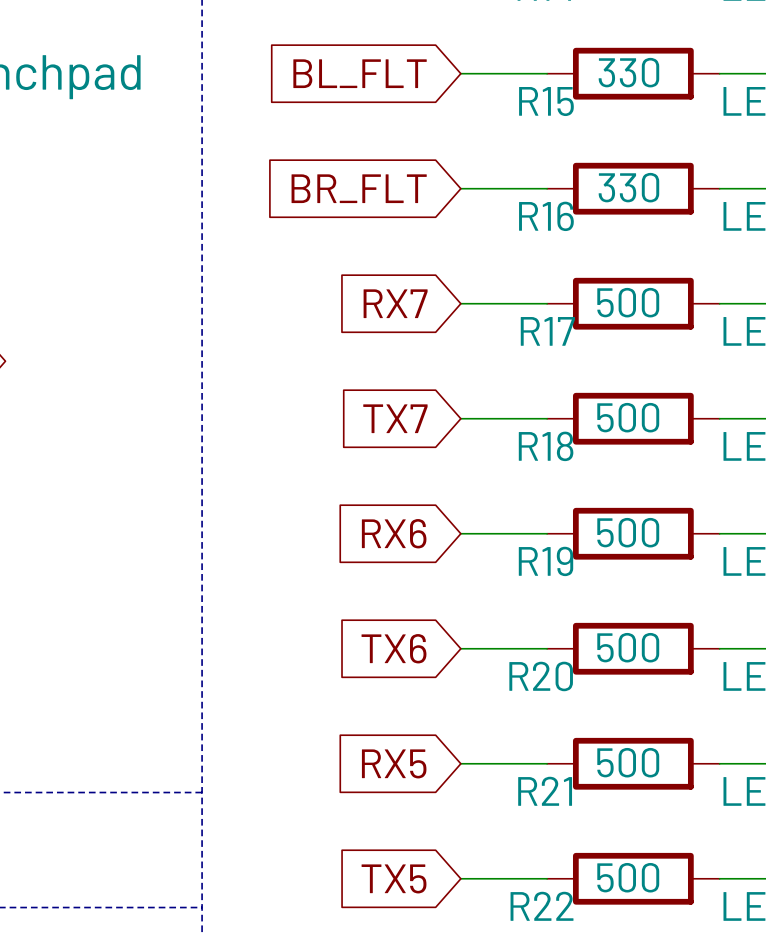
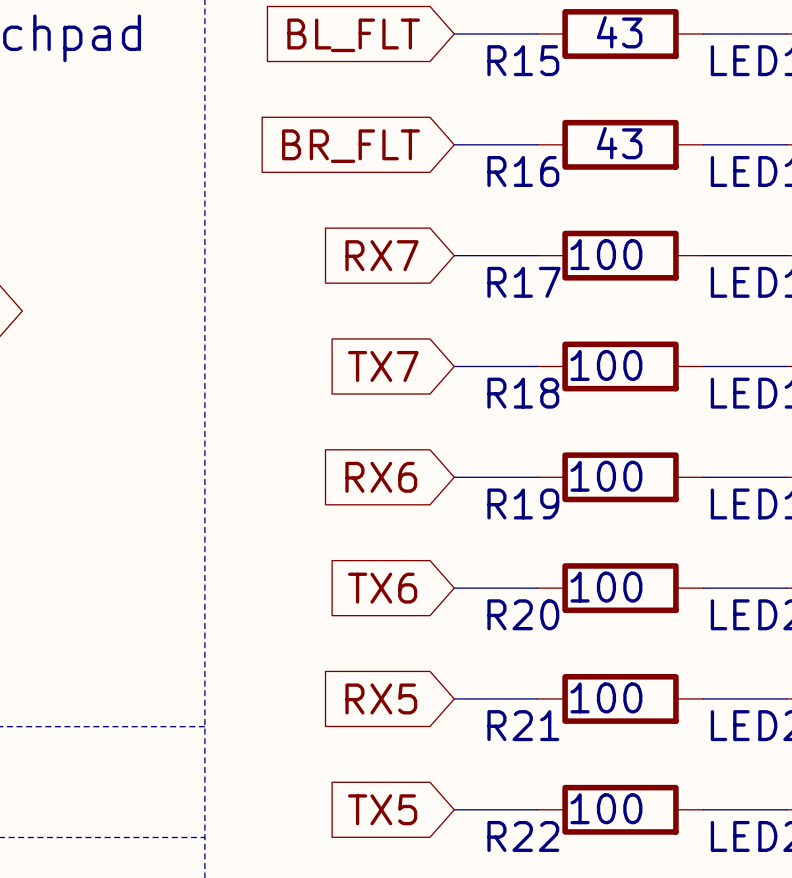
R15 value: 330 (628, 72) -> 43 (619, 32)
R16 value: 330 (628, 187) -> 43 (619, 143)
R17 value: 500 (628, 302) -> 100 (606, 254)
R18 value: 500 (628, 417) -> 100 (606, 365)
R19 value: 500 (628, 532) -> 100 (606, 476)
R20 value: 500 (628, 647) -> 100 (606, 587)
R21 value: 500 (628, 762) -> 100 (606, 697)
R22 value: 500 (628, 877) -> 100 (606, 808)

